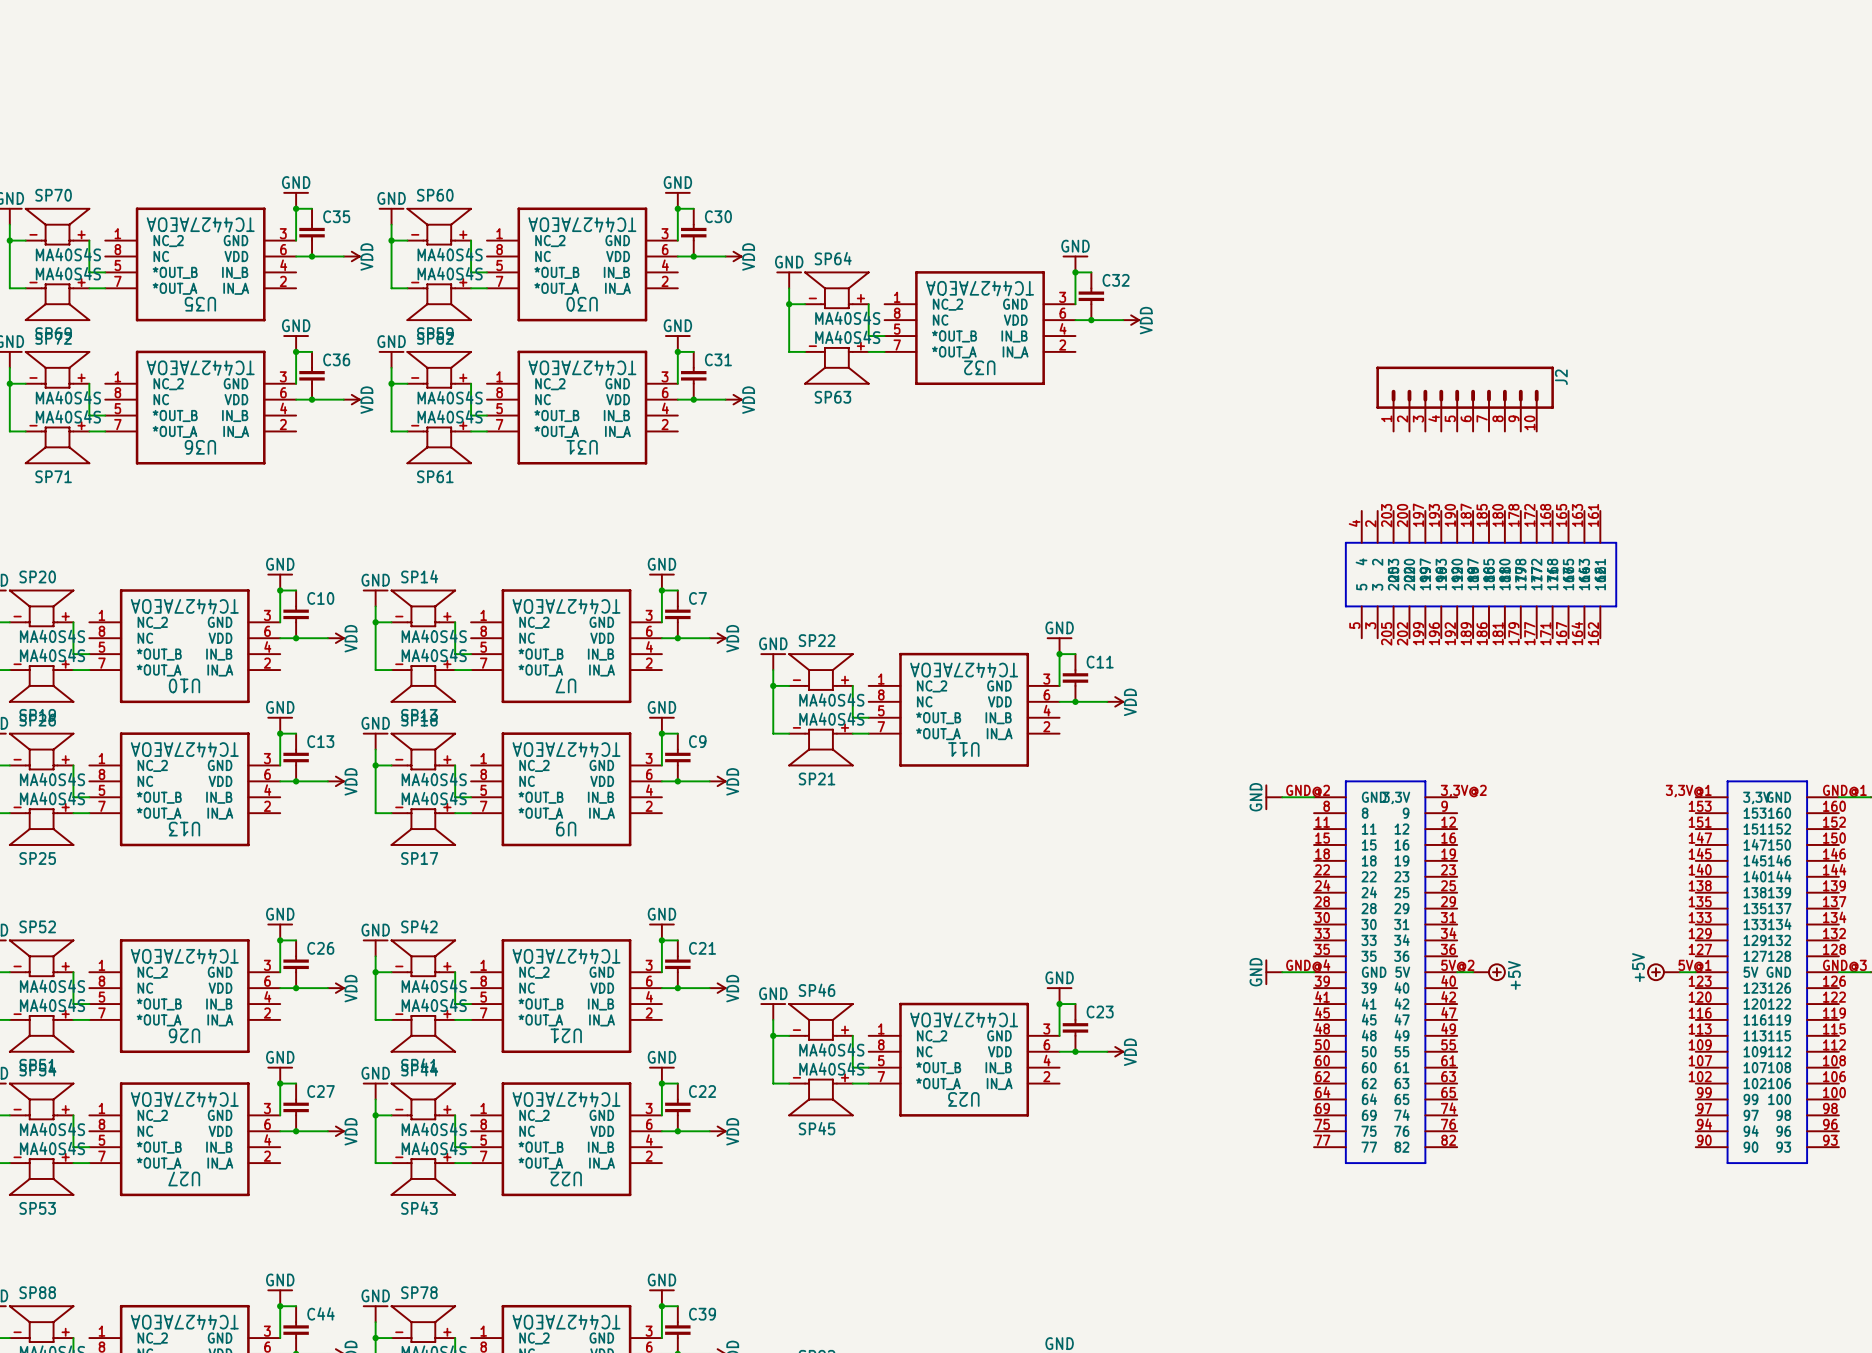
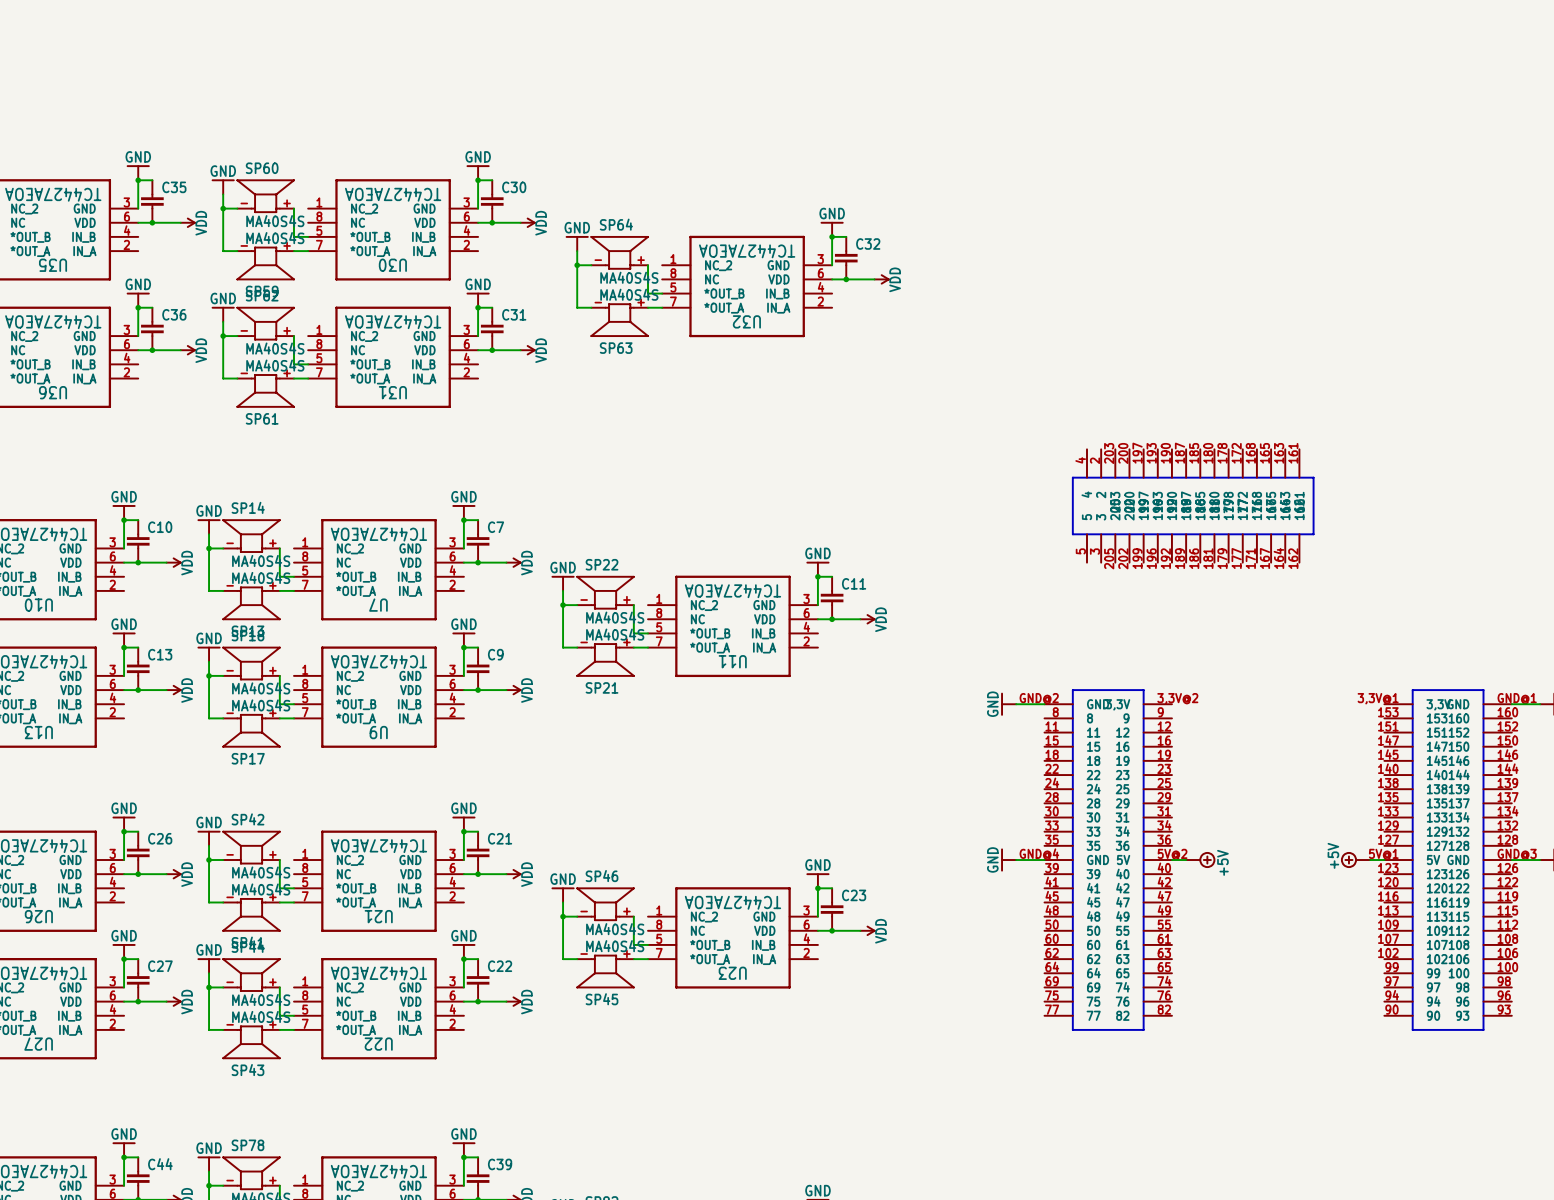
J2: (1465, 399) -> none

